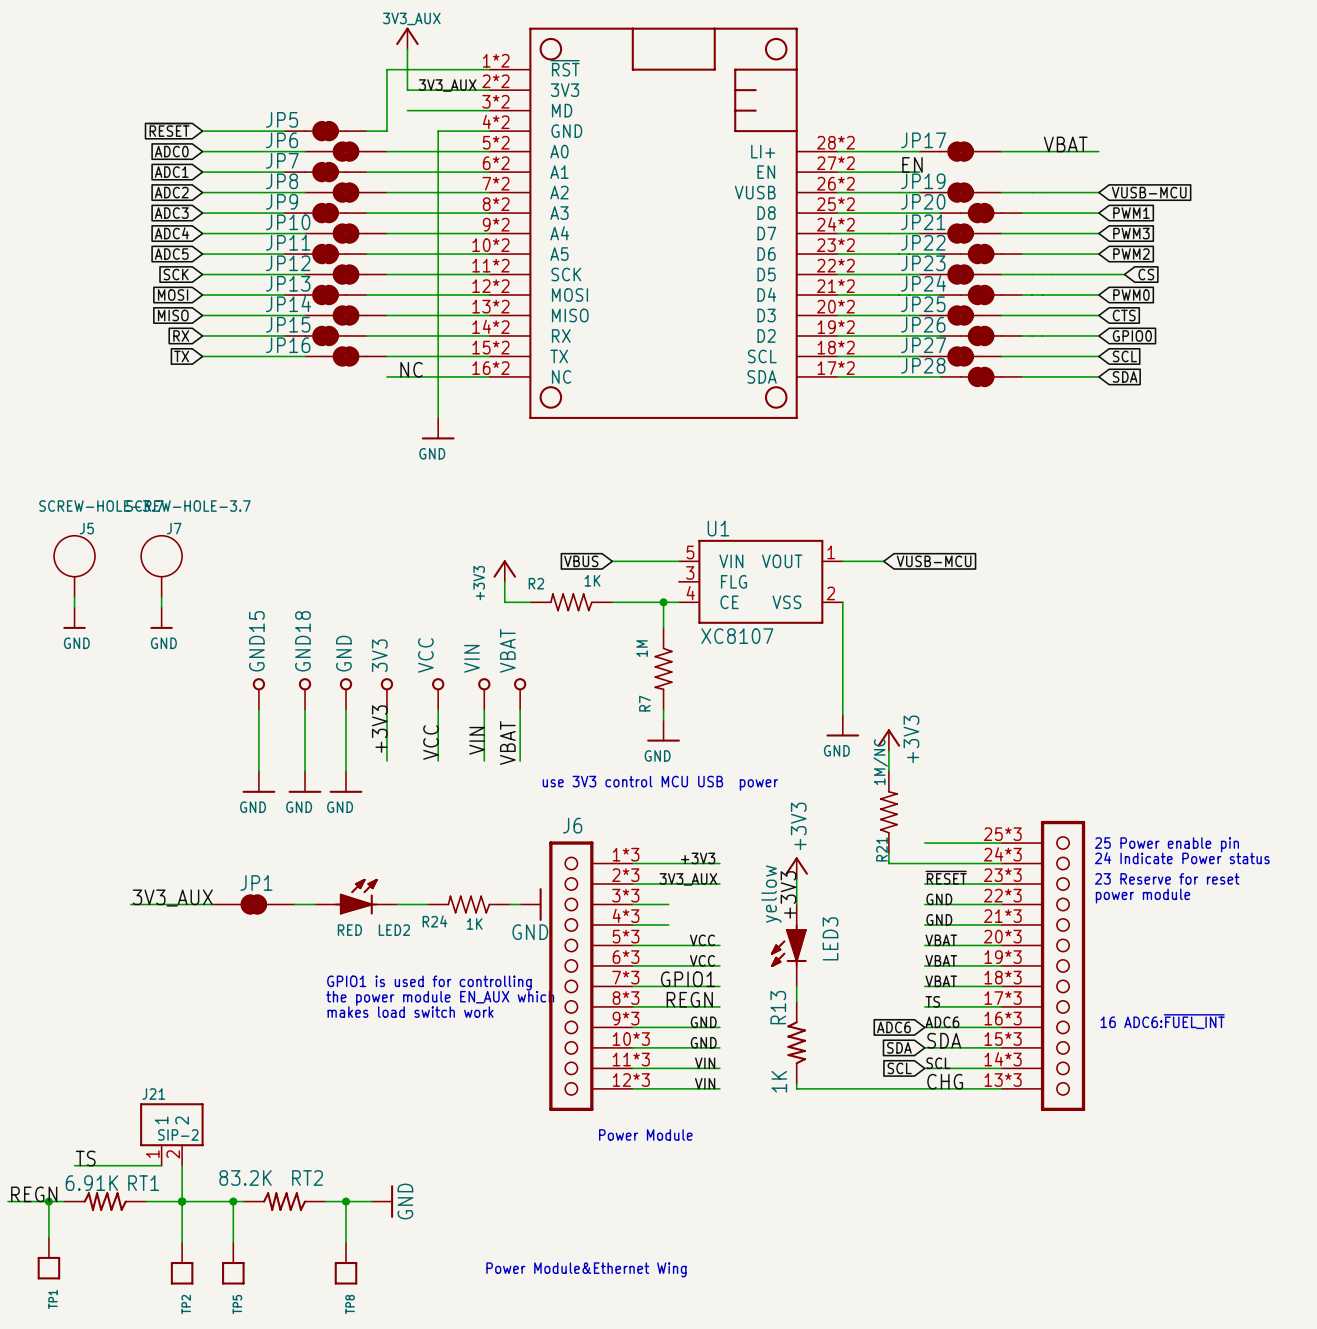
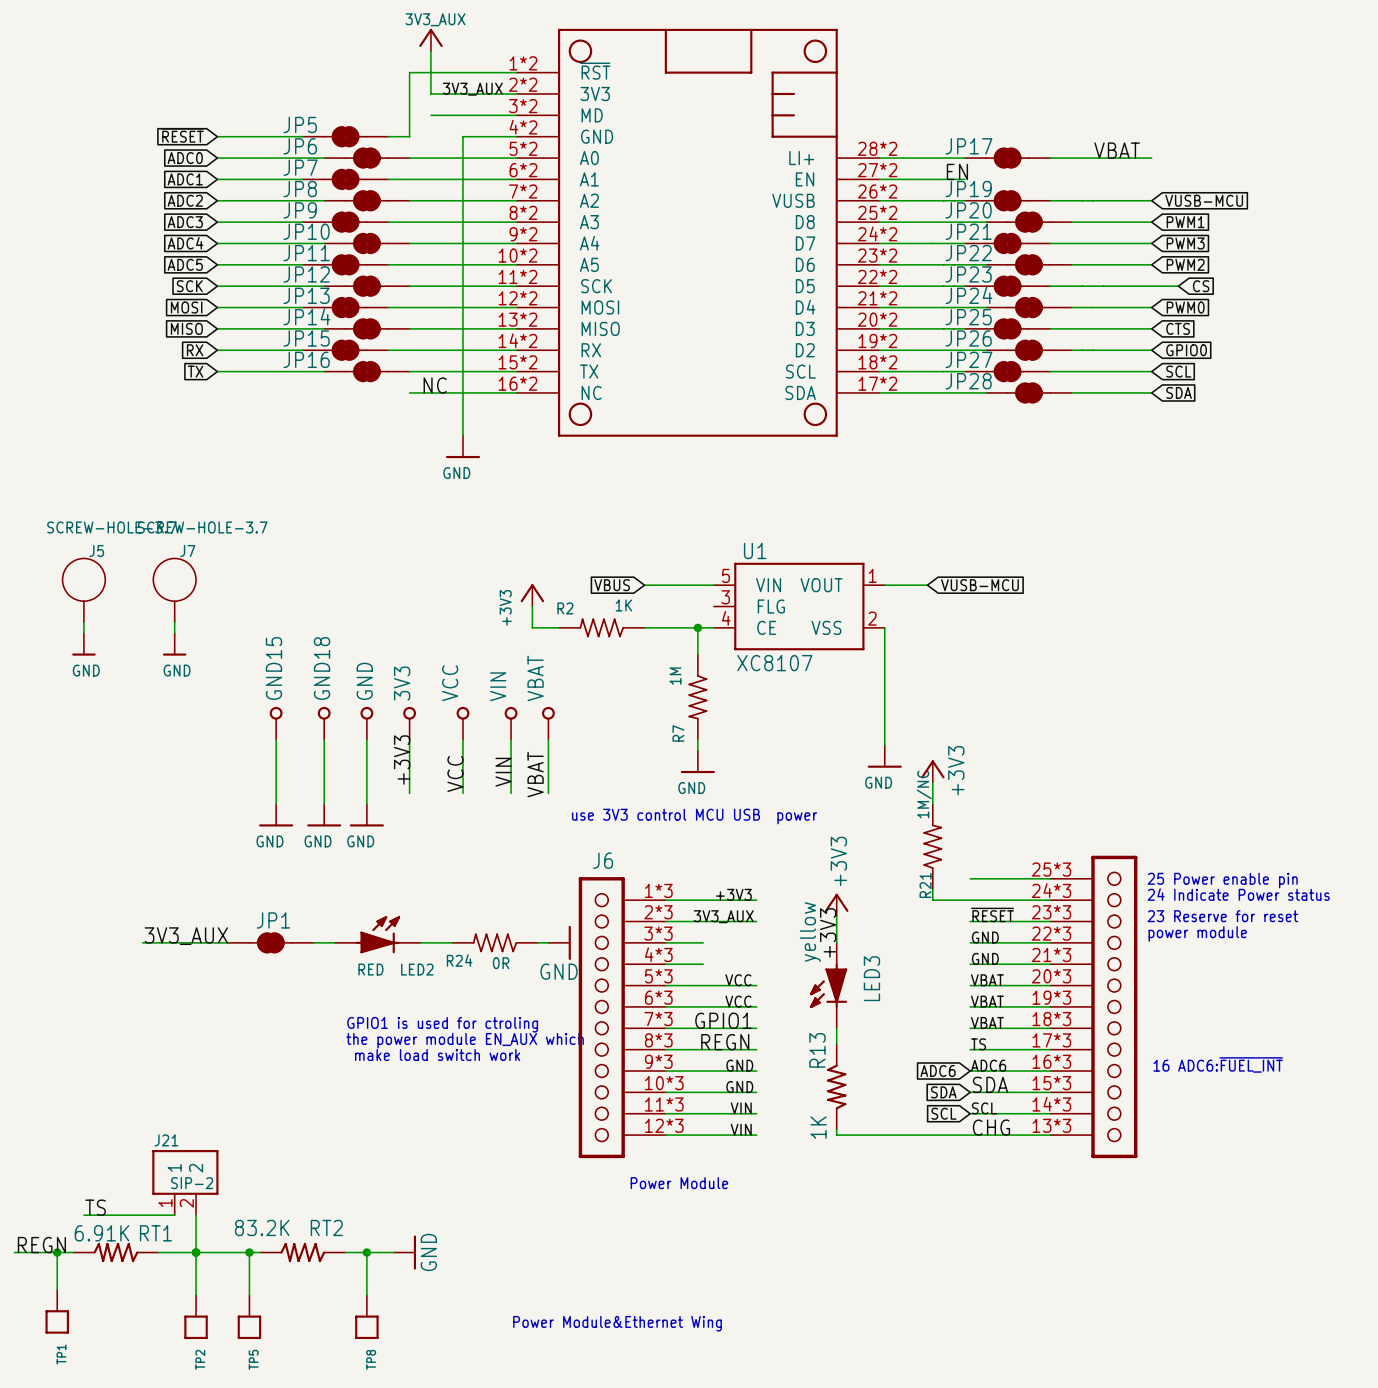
R24 value: 1K (474, 923) -> 0R (501, 963)
text: GPIO1 is used for controlling (429, 983) -> GPIO1 is used for ctroling (442, 1024)
text: makes load switch work (410, 1012) -> make load switch work (437, 1054)

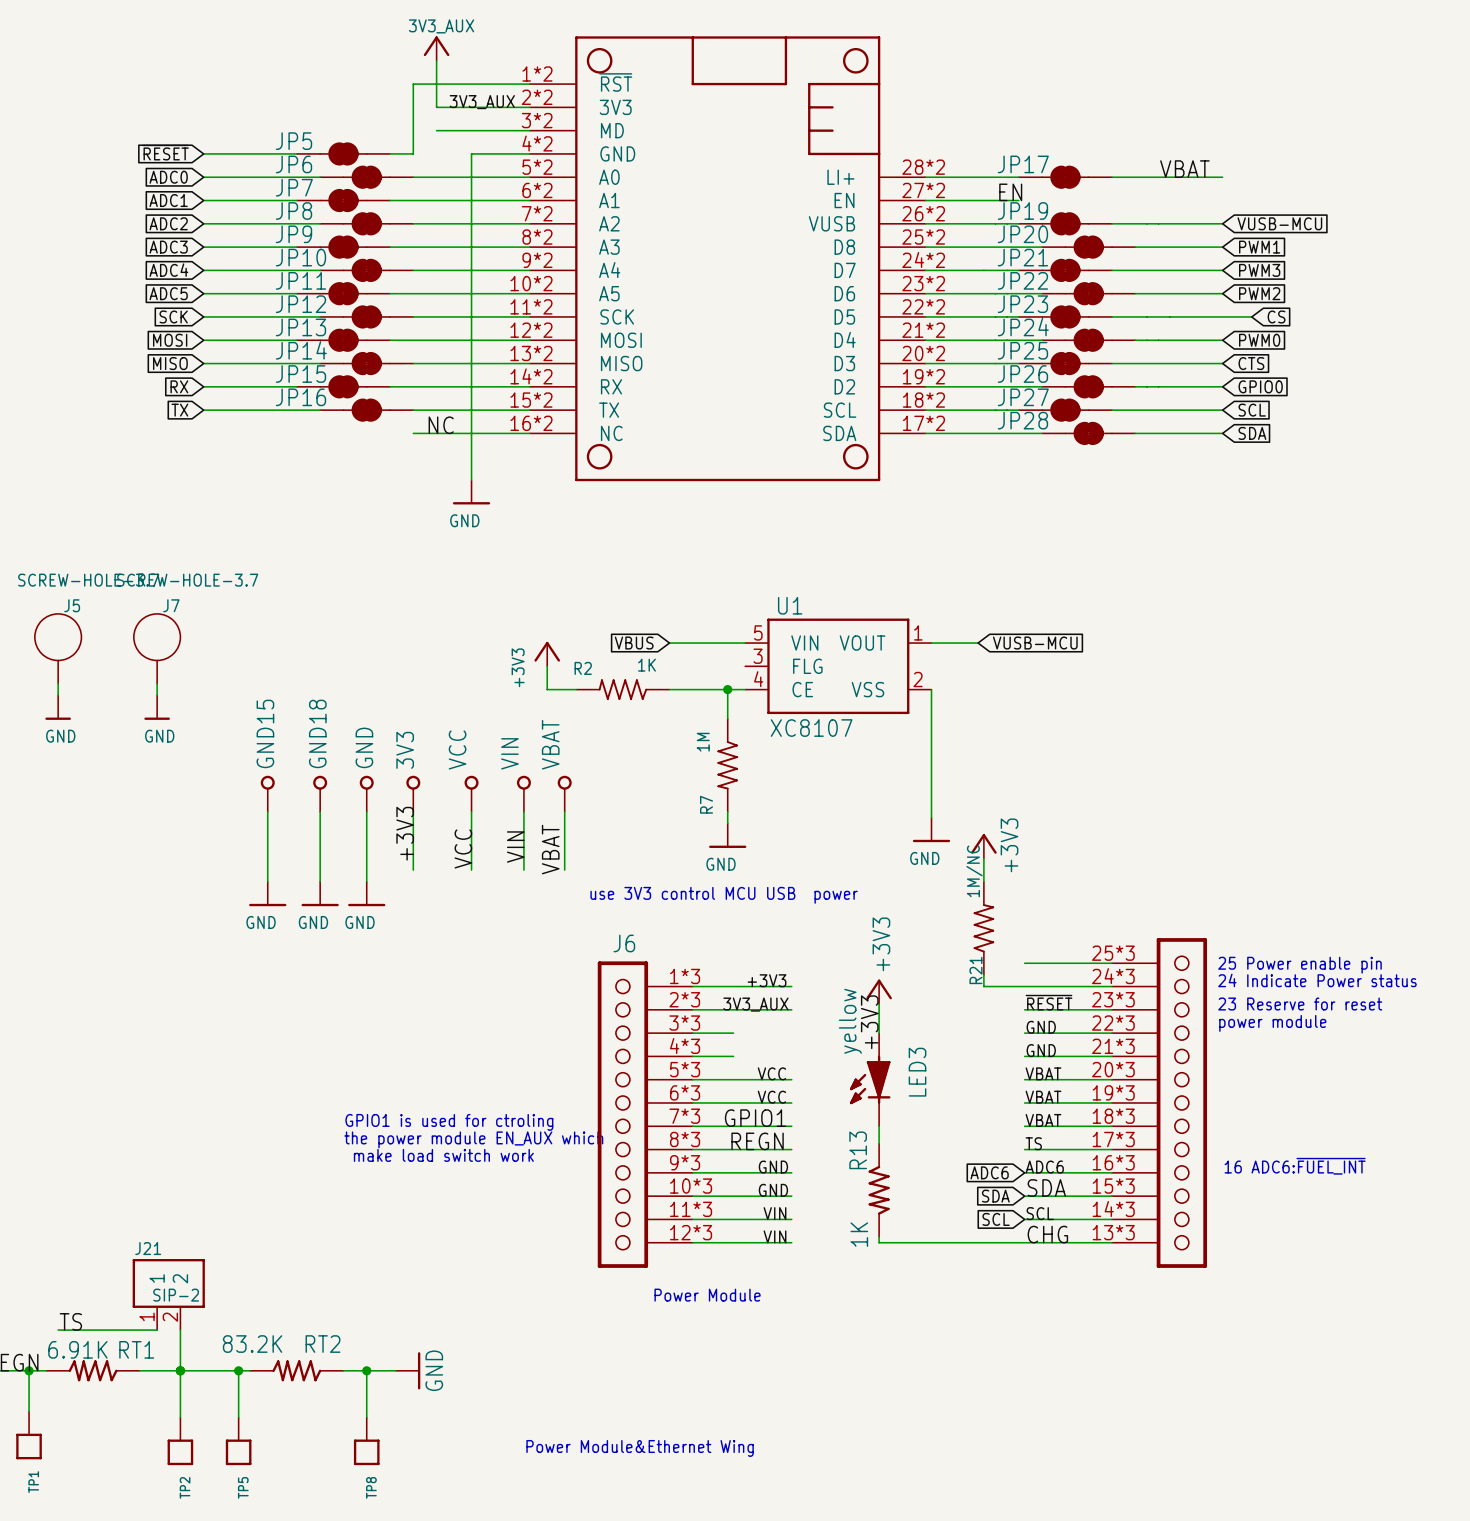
LED2: RED (377, 934) -> none
label: 3V3_AUX (186, 936) -> none
wire: (142, 942) (228, 942) -> none
JP1: (270, 942) -> none
wire: (313, 942) (334, 942) -> none
wire: (420, 942) (452, 942) -> none
R24: 0R (495, 942) -> none
wire: (537, 942) (548, 942) -> none
power symbol: GND (559, 942) -> none

